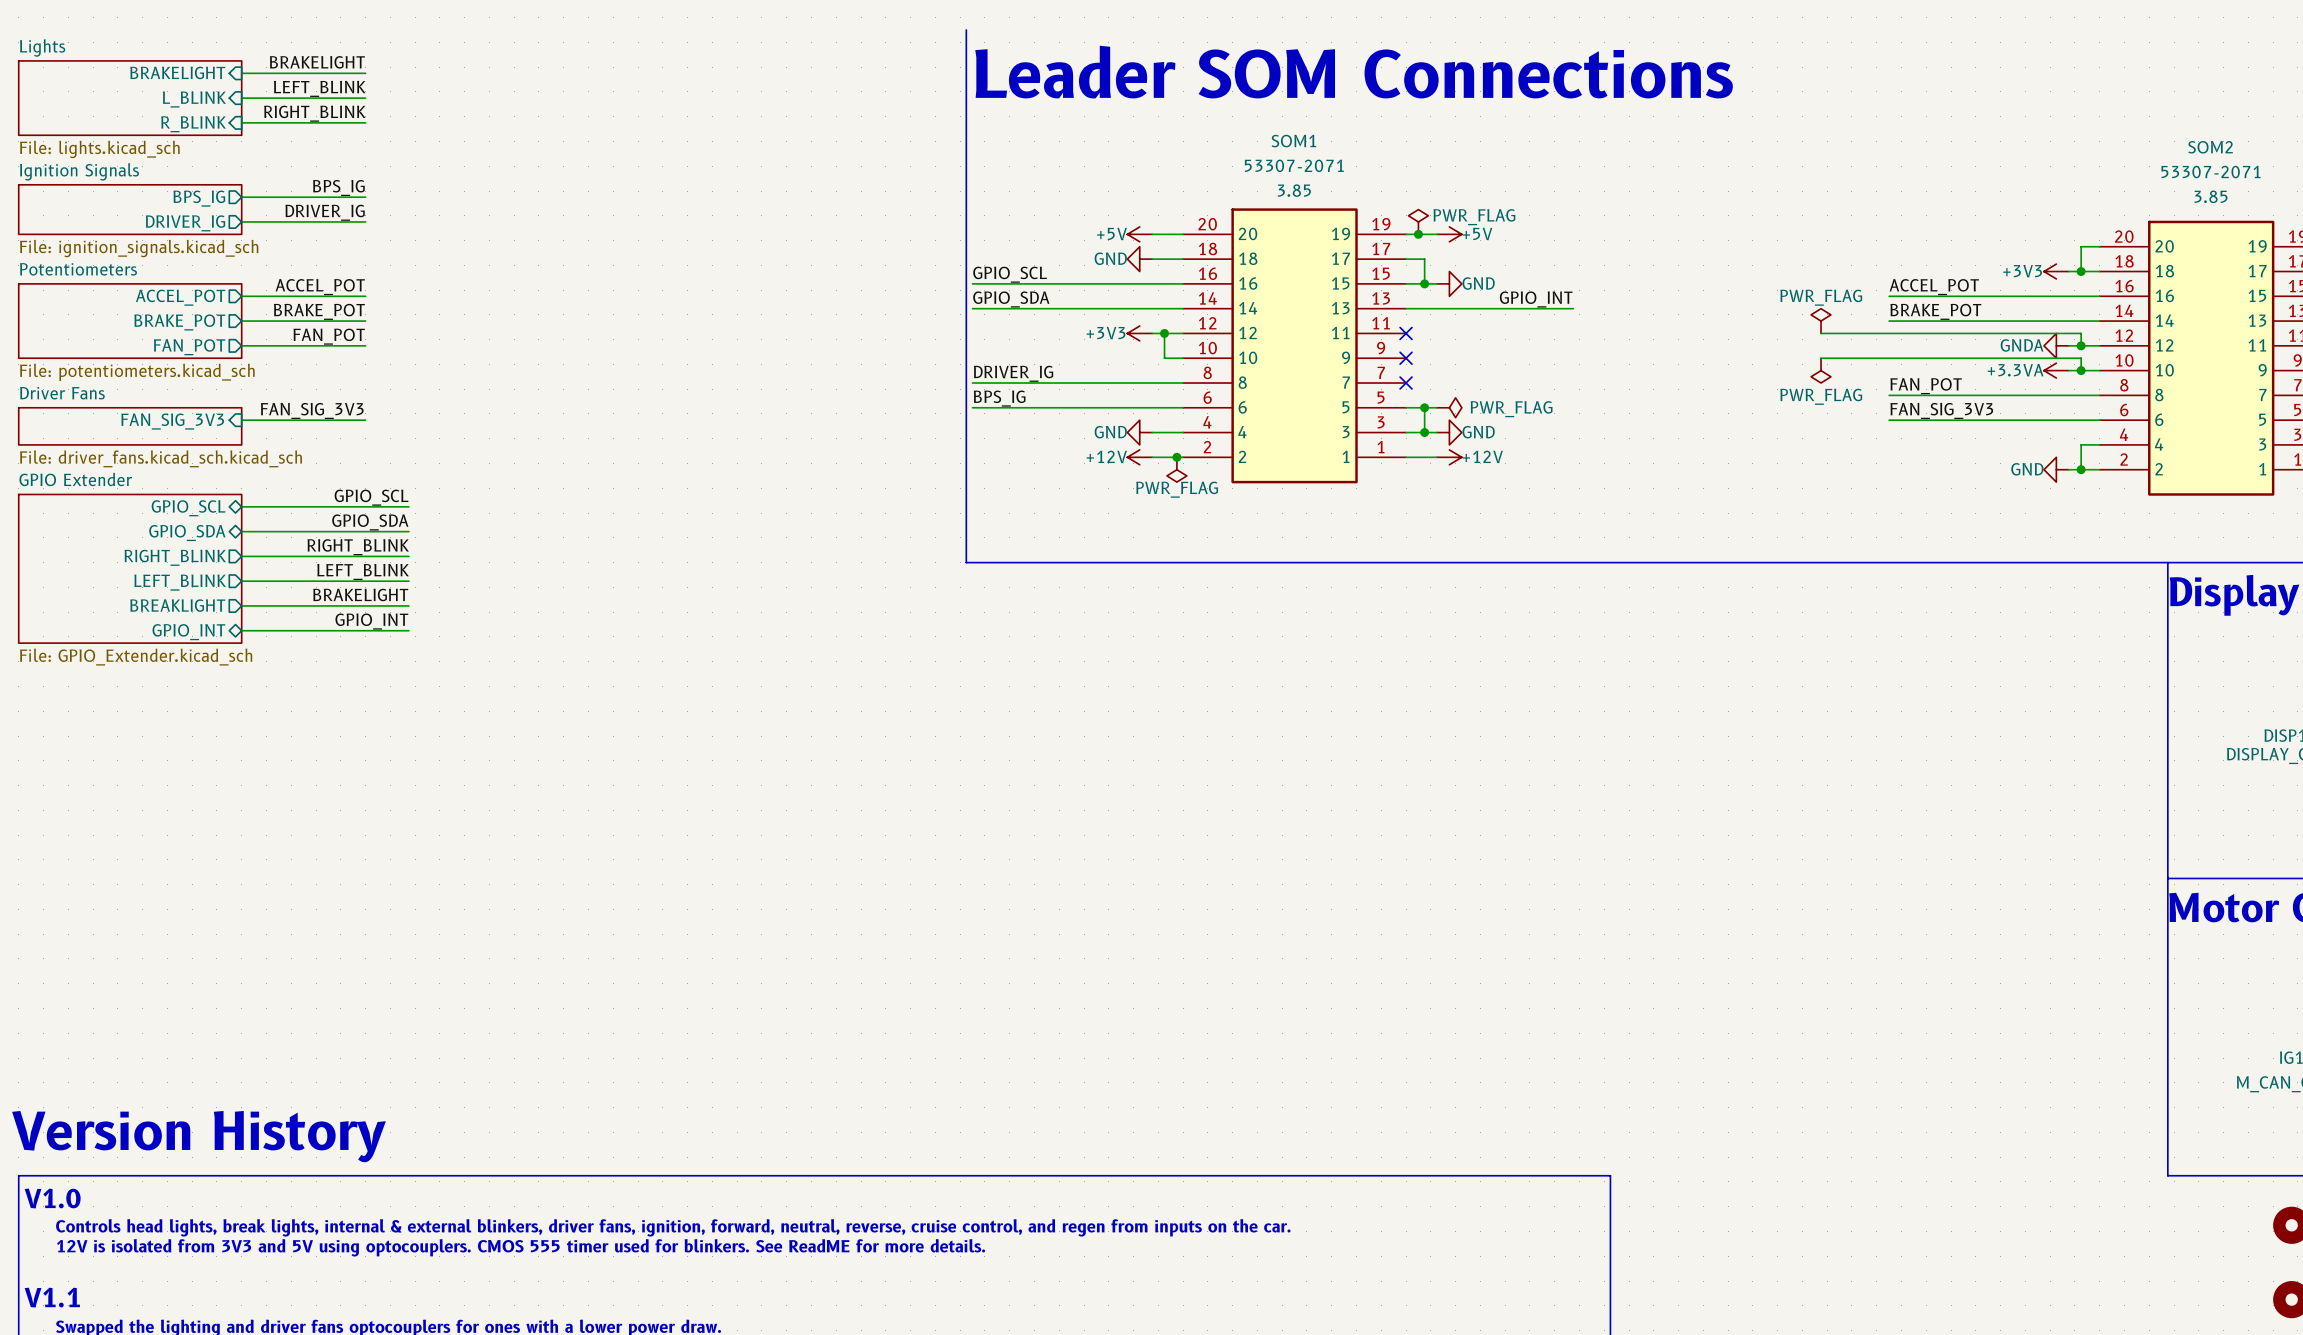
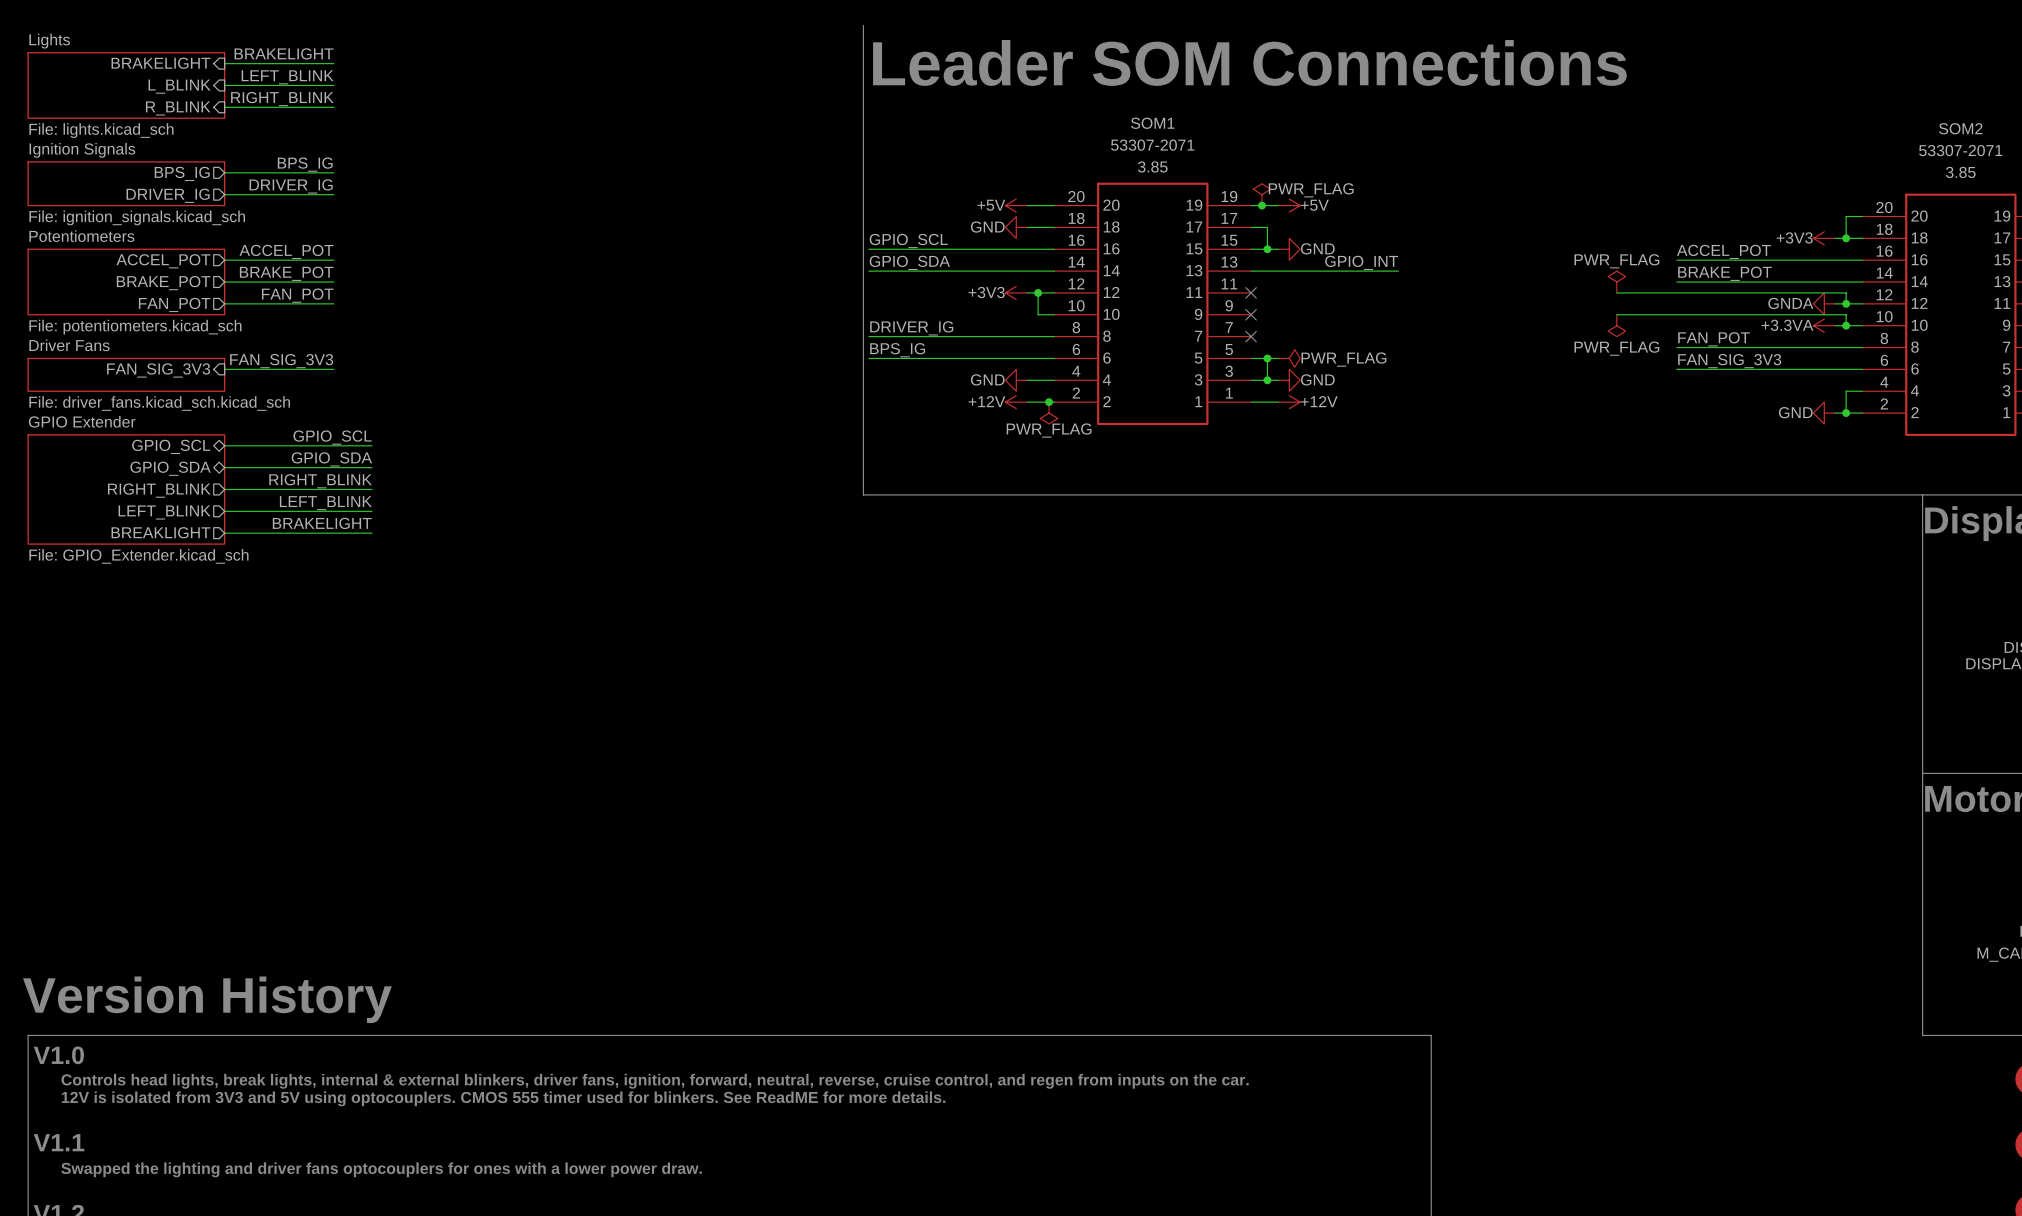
sheet GPIO Extender: none -> File: GPIO_Extender.kicad_sch (126, 489)
sheet GPIO Extender: File: GPIO_Extender.kicad_sch (130, 568) -> none
label: GPIO_INT (371, 621) -> none
wire: (241, 630) (408, 630) -> none
sheet pin: GPIO_INT (188, 632) -> none

